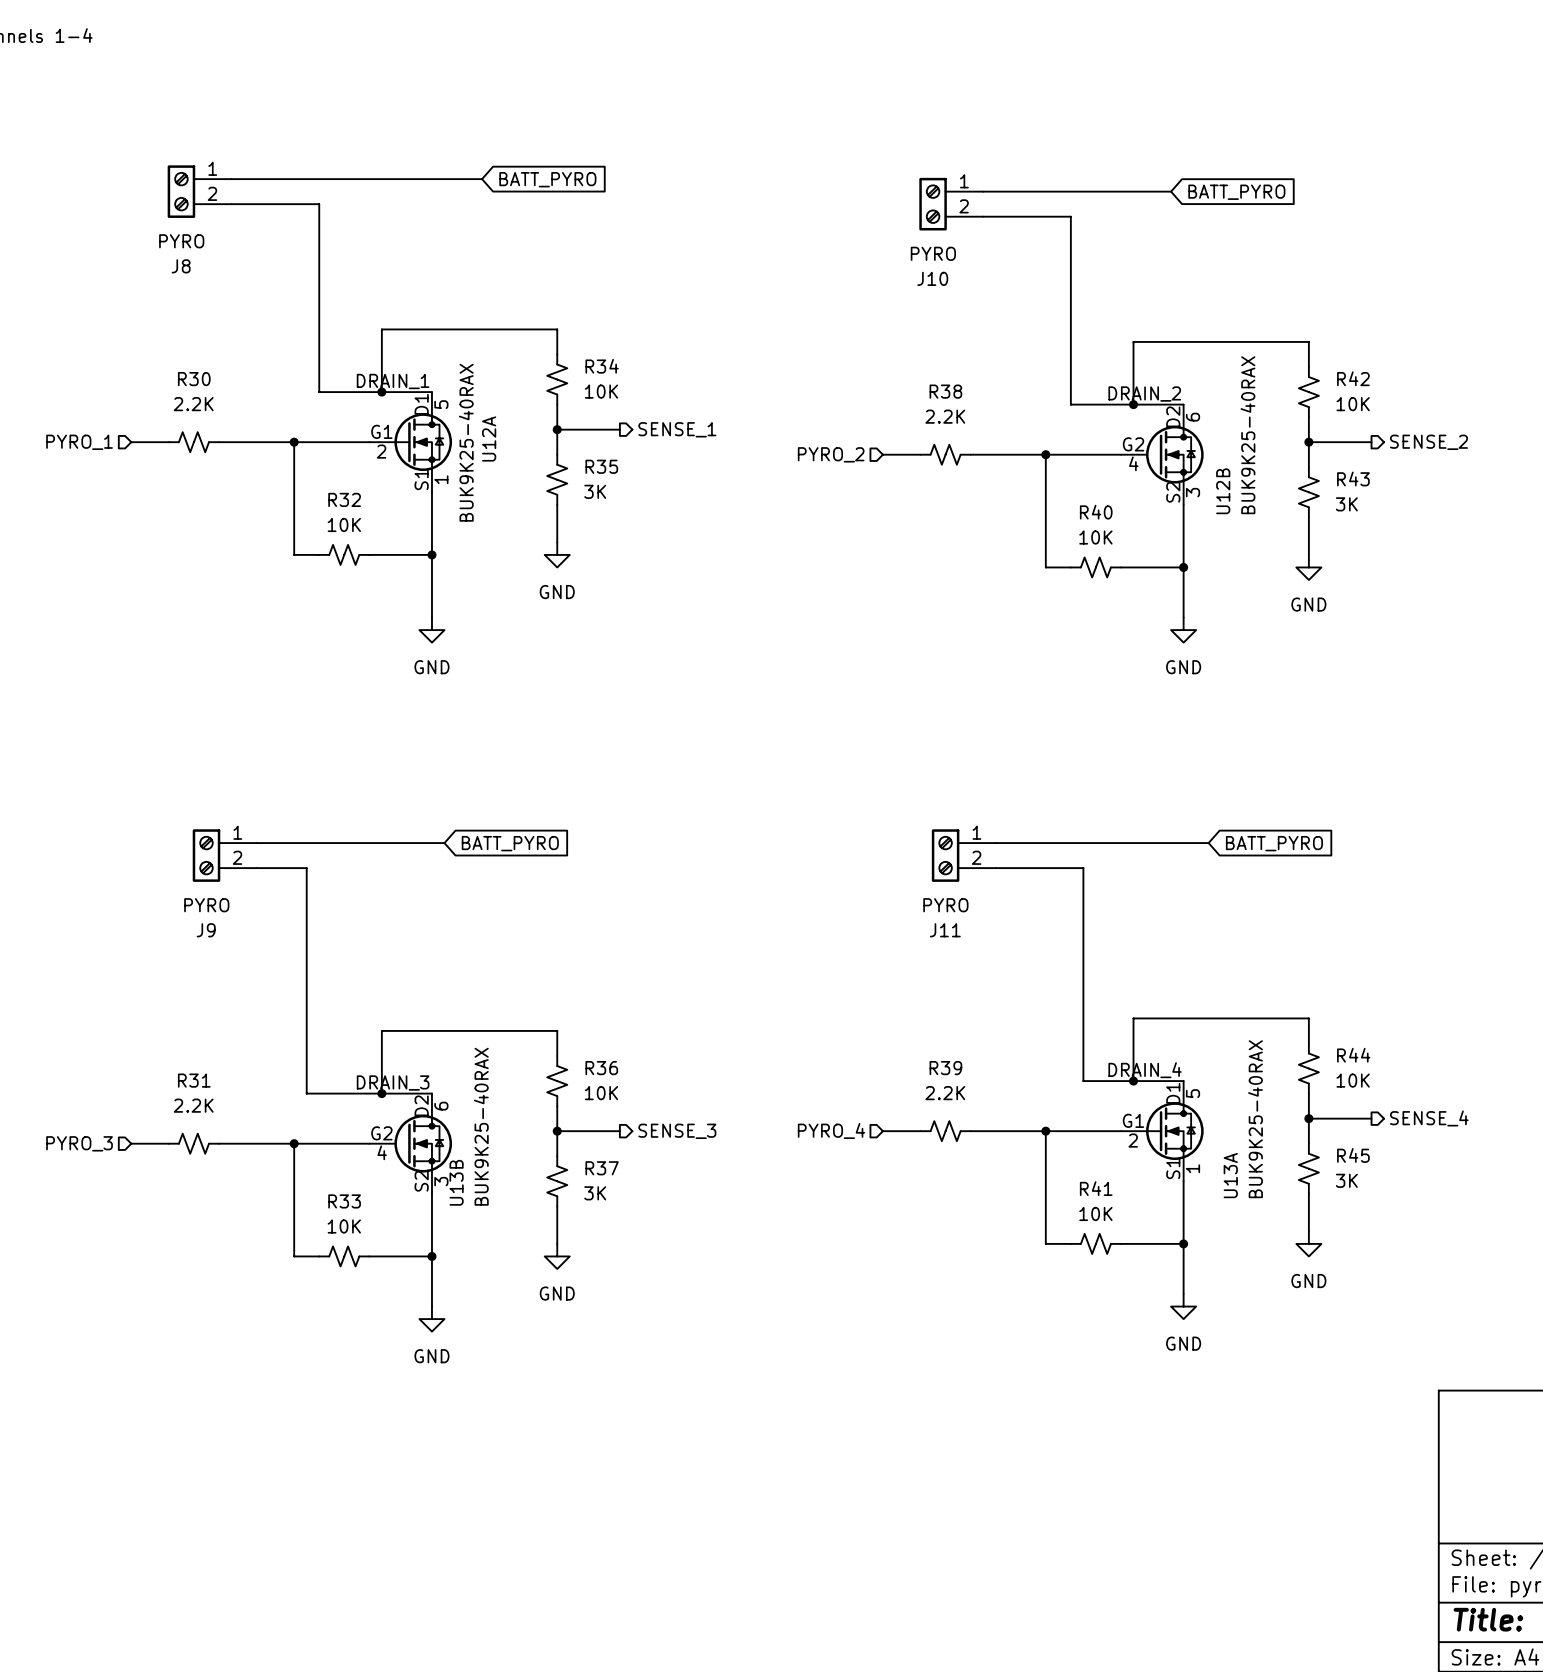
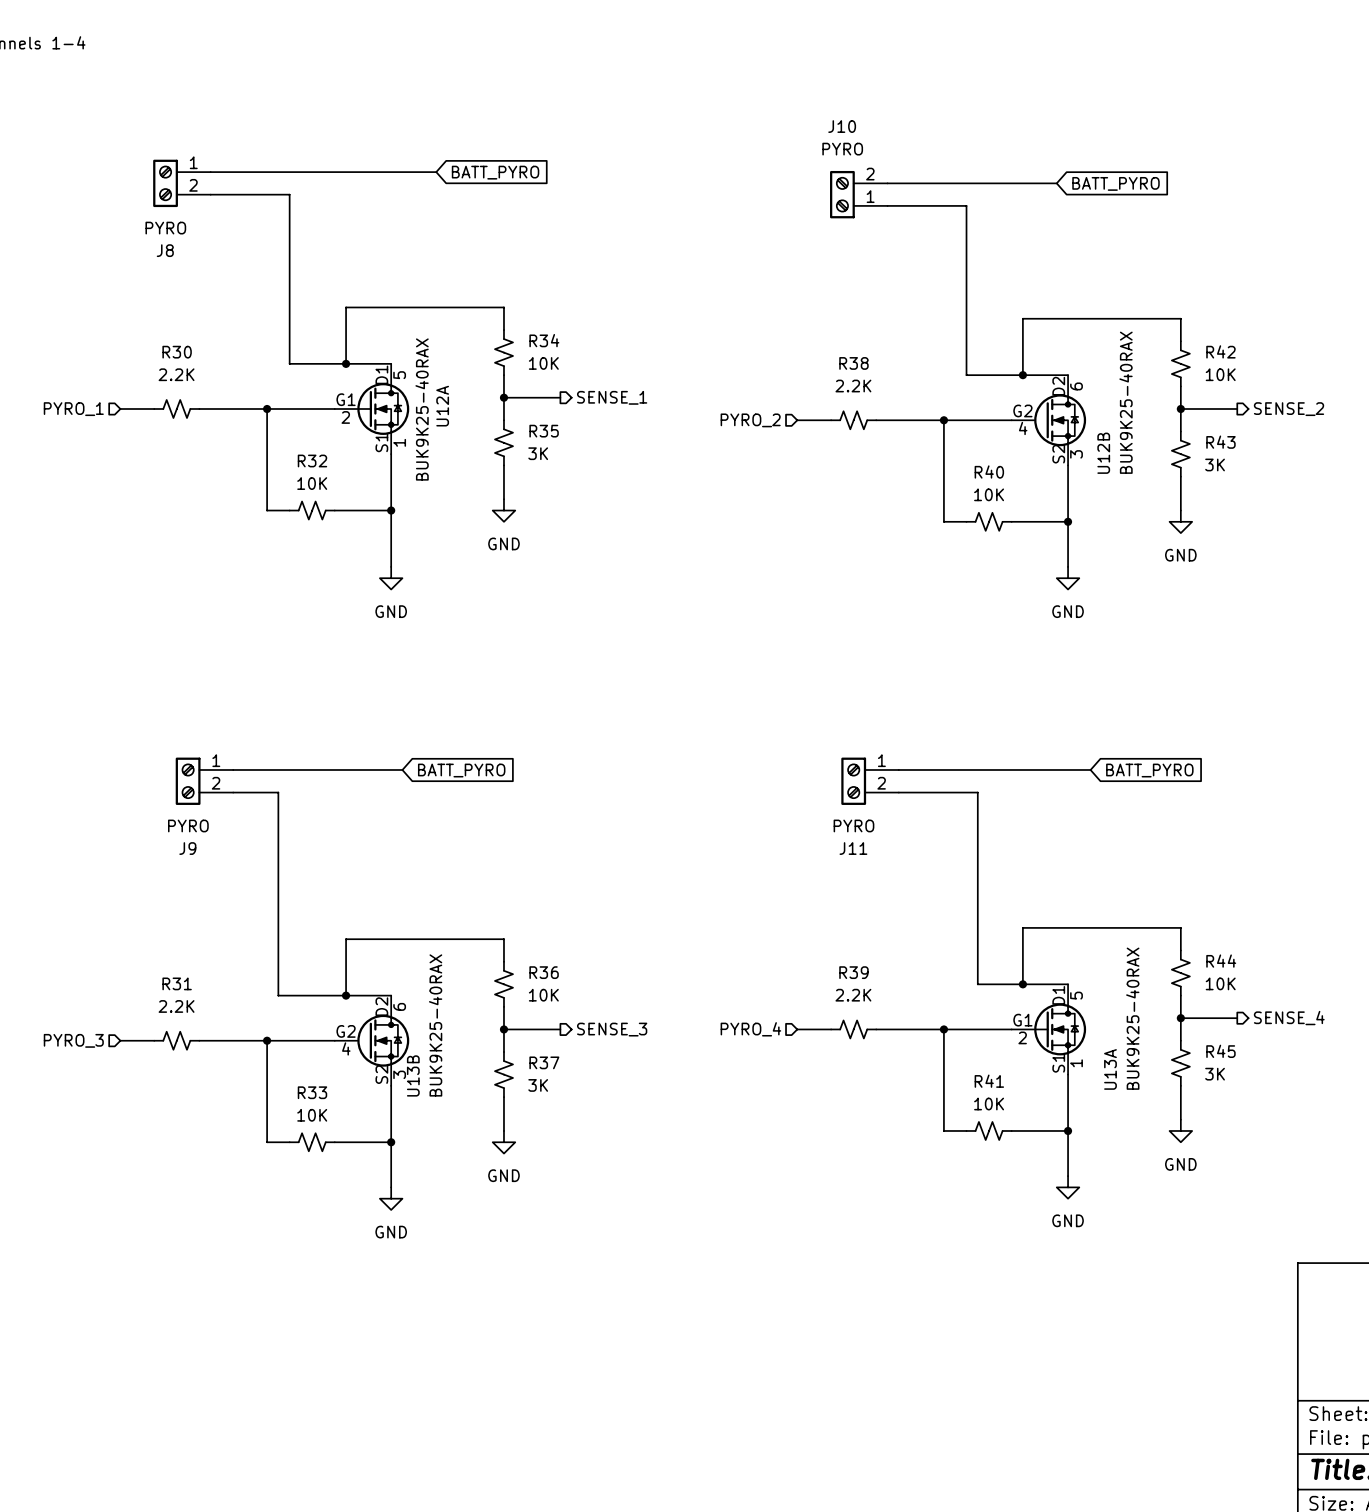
J10 flip: as is (933, 204) -> up-down (842, 194)
label: DRAIN_1 (393, 381) -> none
label: DRAIN_2 (1144, 394) -> none
label: DRAIN_4 (1145, 1070) -> none
label: DRAIN_3 (393, 1083) -> none

